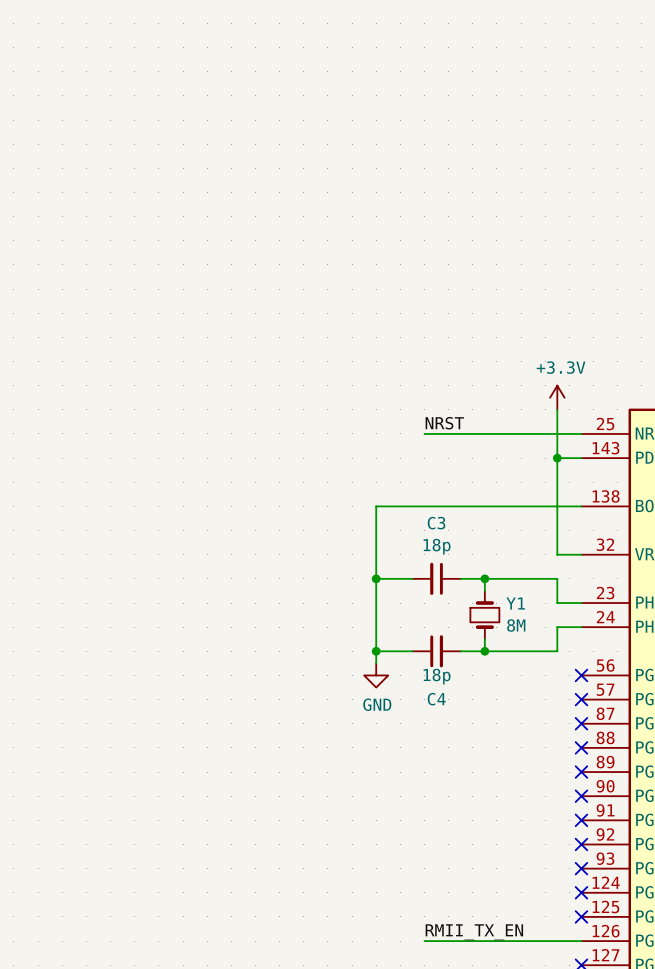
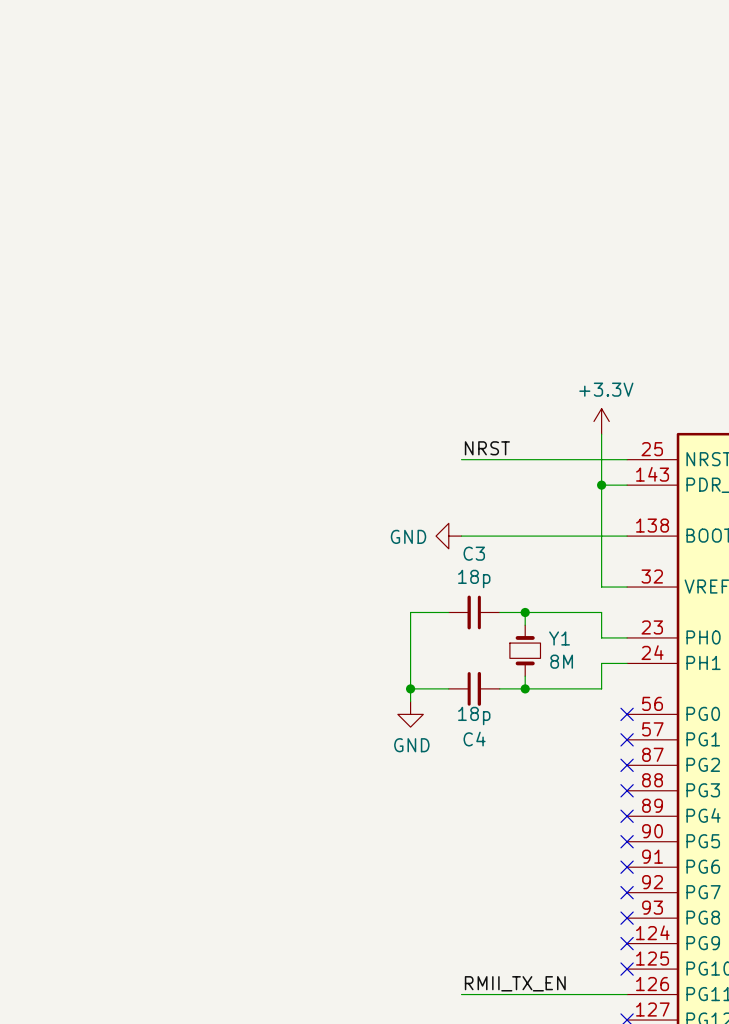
power symbol: none -> GND (448, 536)
wire: (424, 506) (376, 506) (376, 578) -> none
junction: (376, 578) -> none

